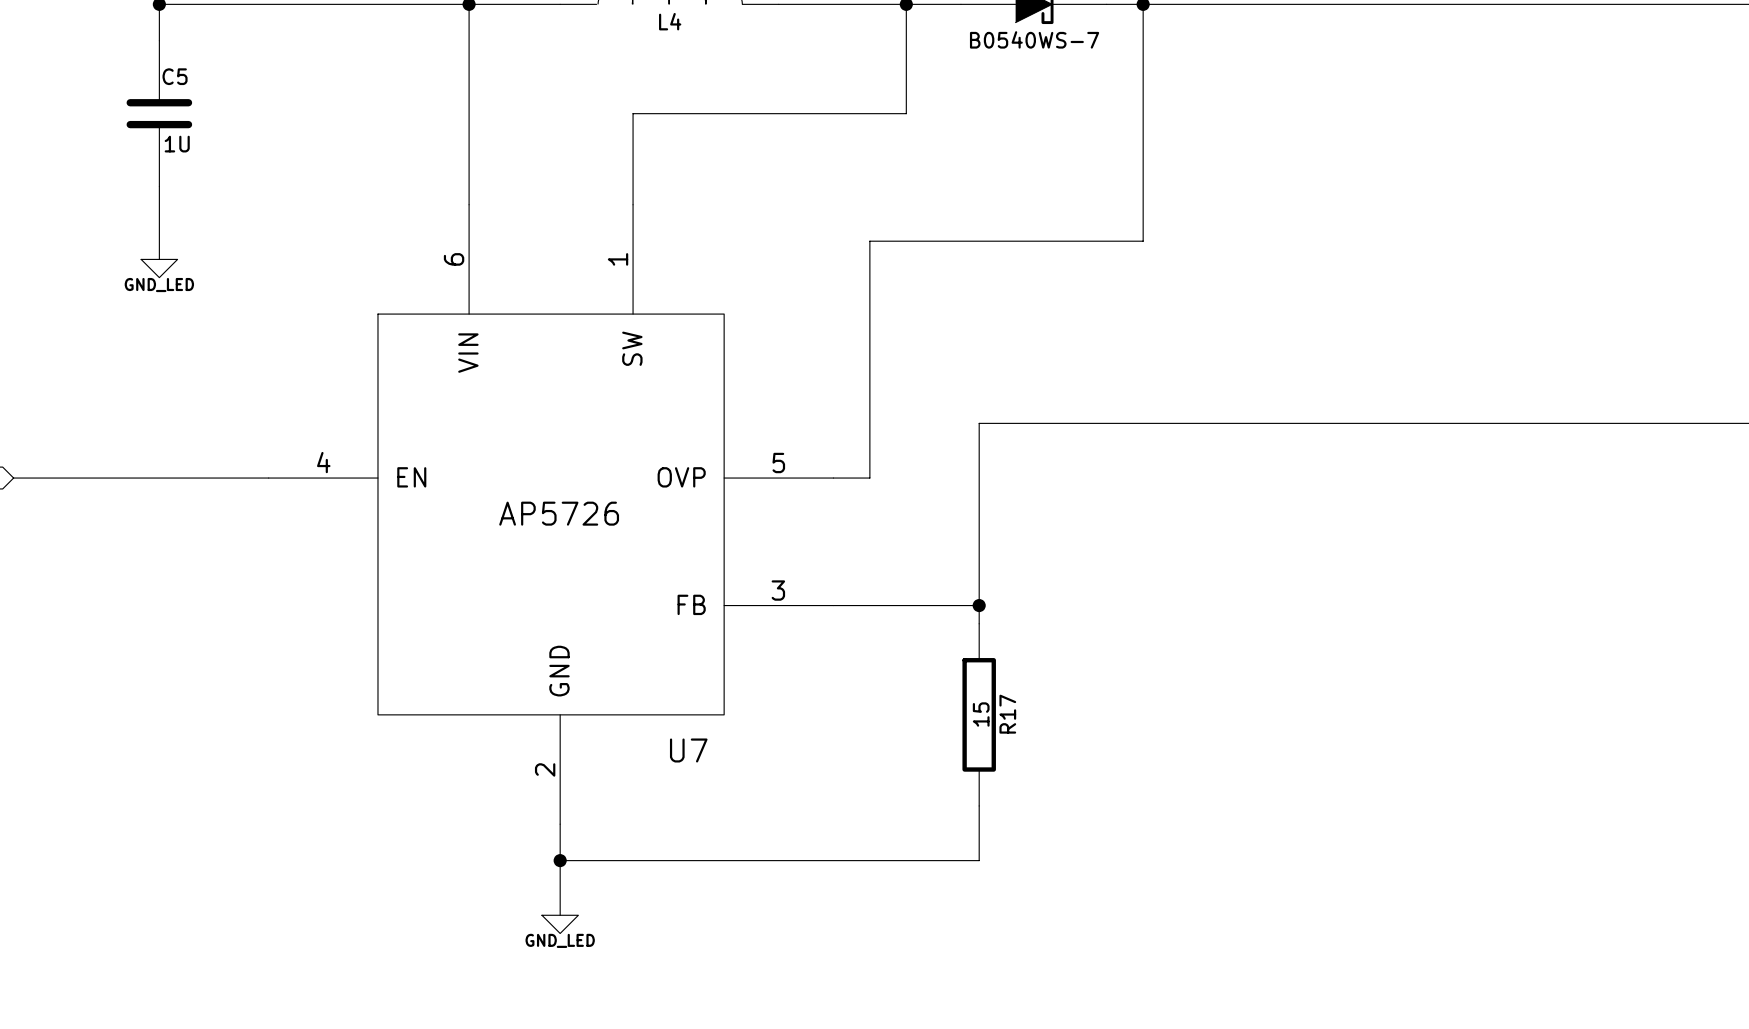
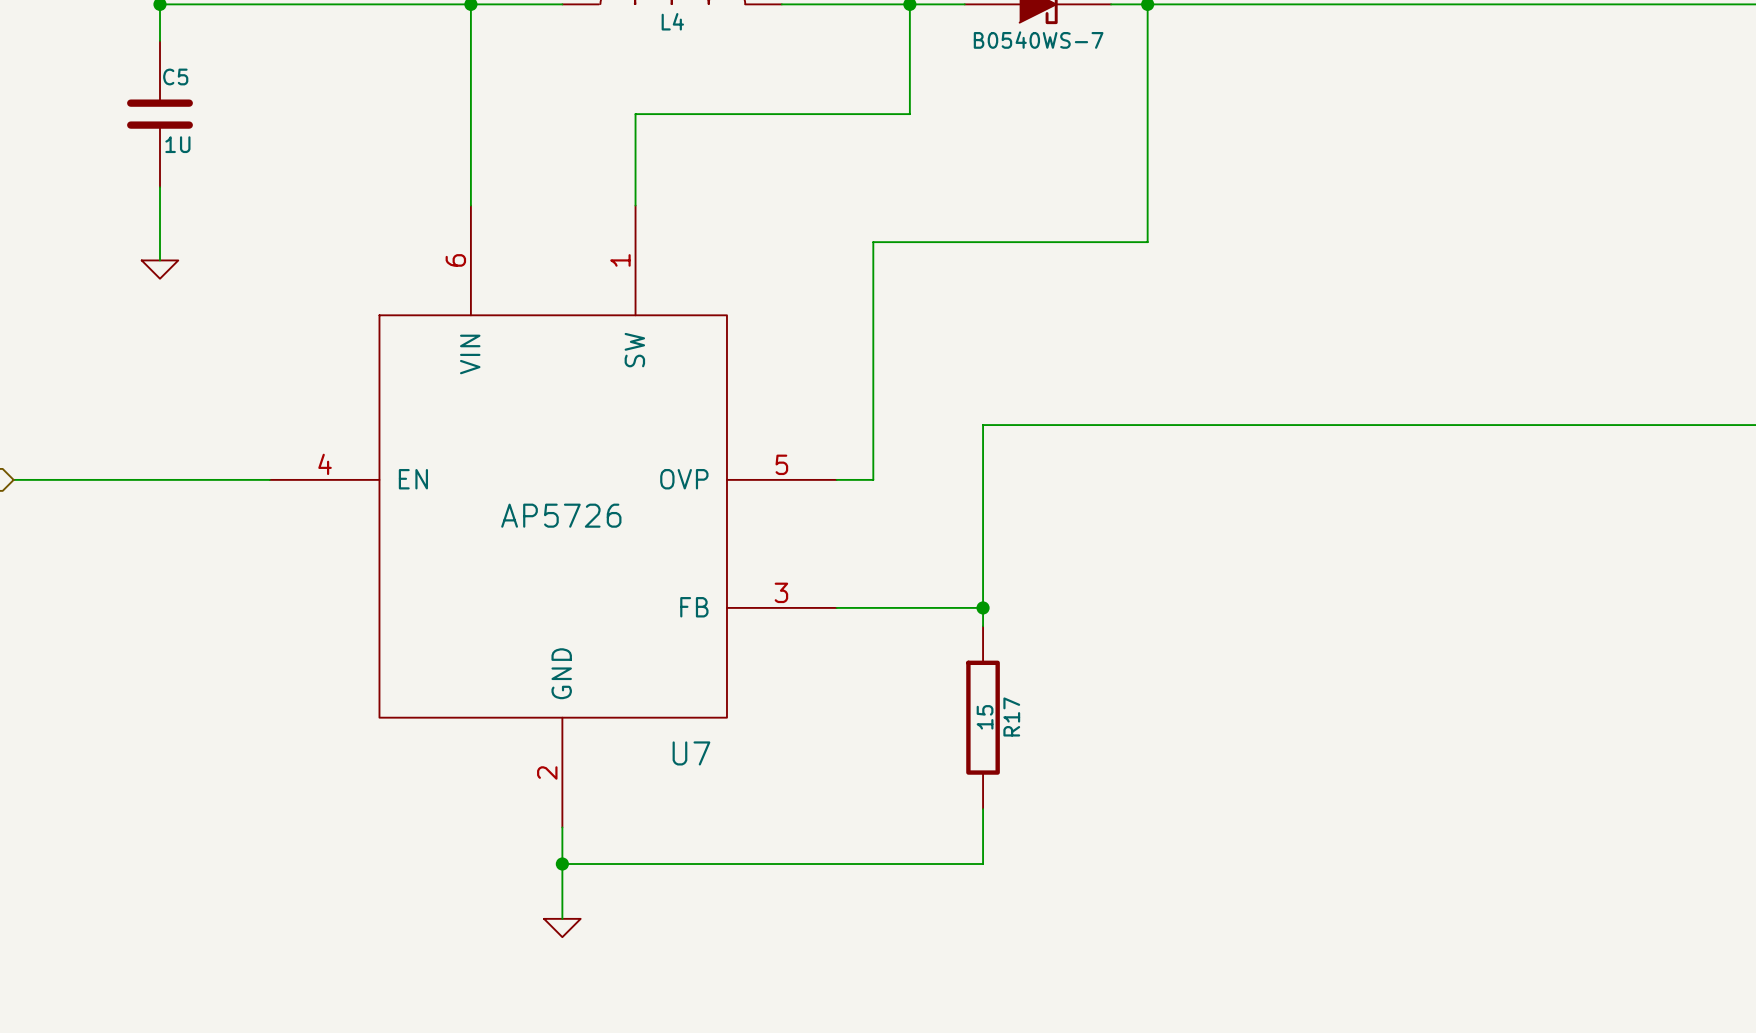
power symbol text: GND_LED (159, 285) -> none
power symbol text: GND_LED (560, 940) -> none

